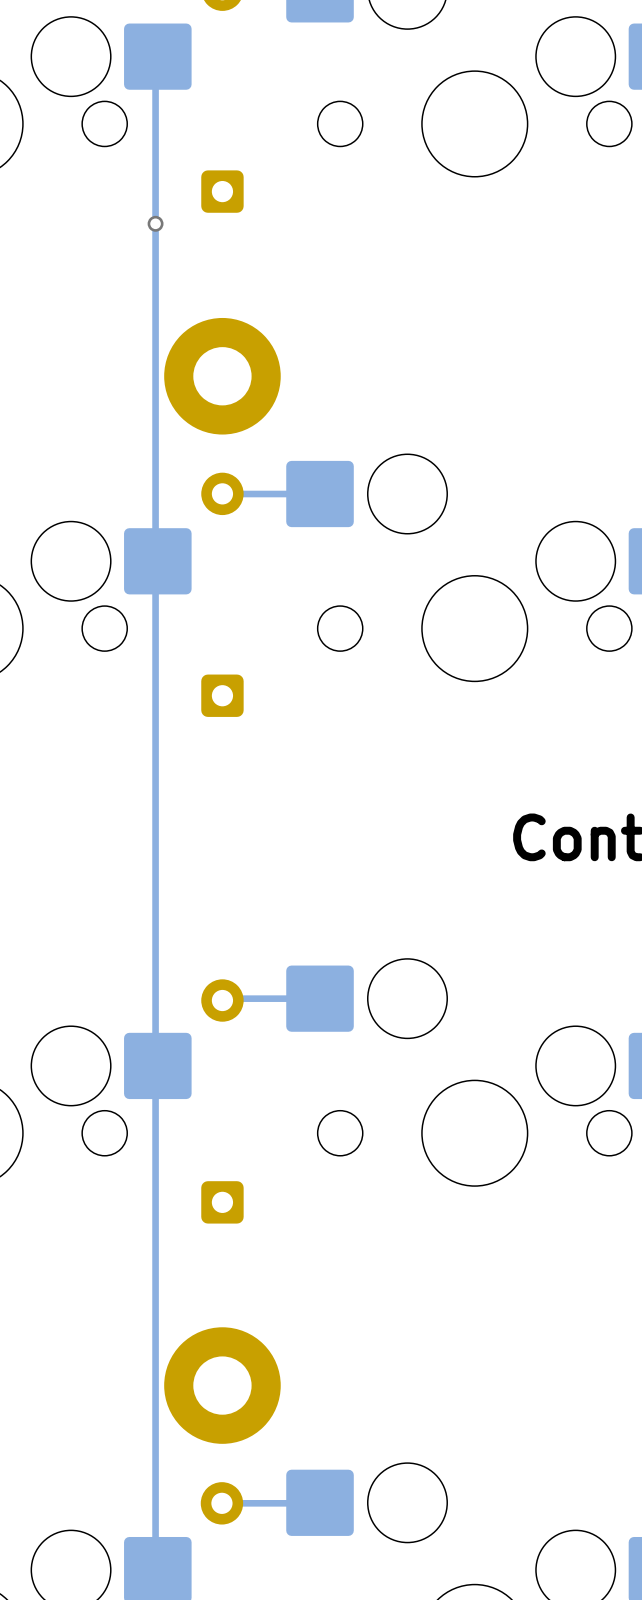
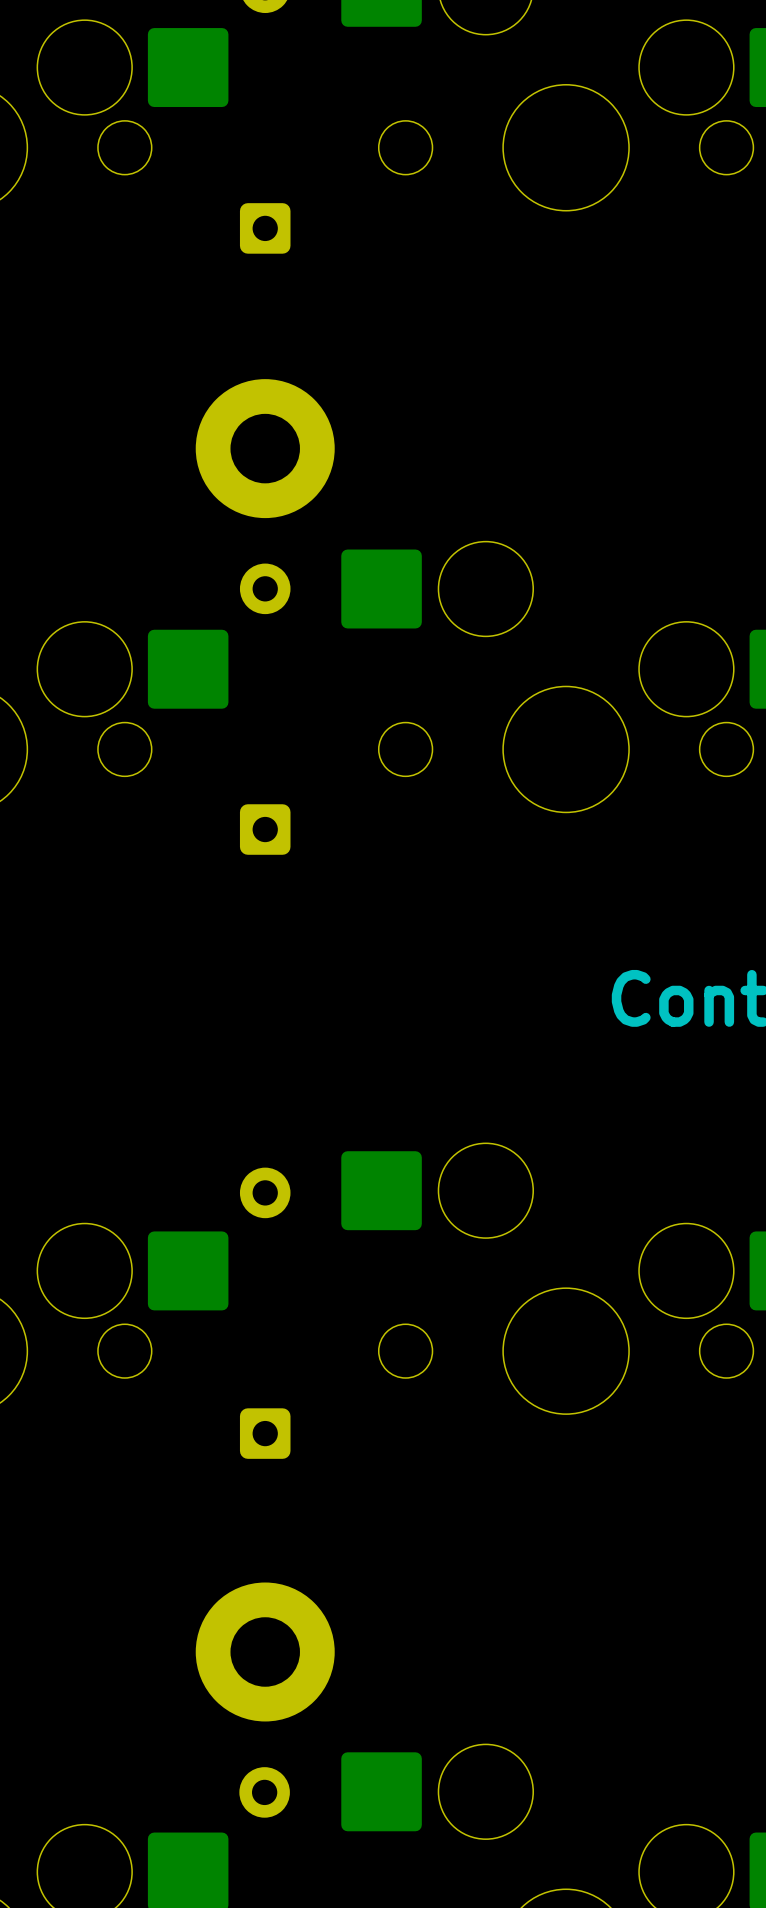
track: (155, 58) (155, 1568) -> none
via: (155, 223) -> none
track: (320, 494) (222, 494) -> none
track: (320, 998) (224, 998) -> none
track: (320, 1503) (222, 1503) -> none

